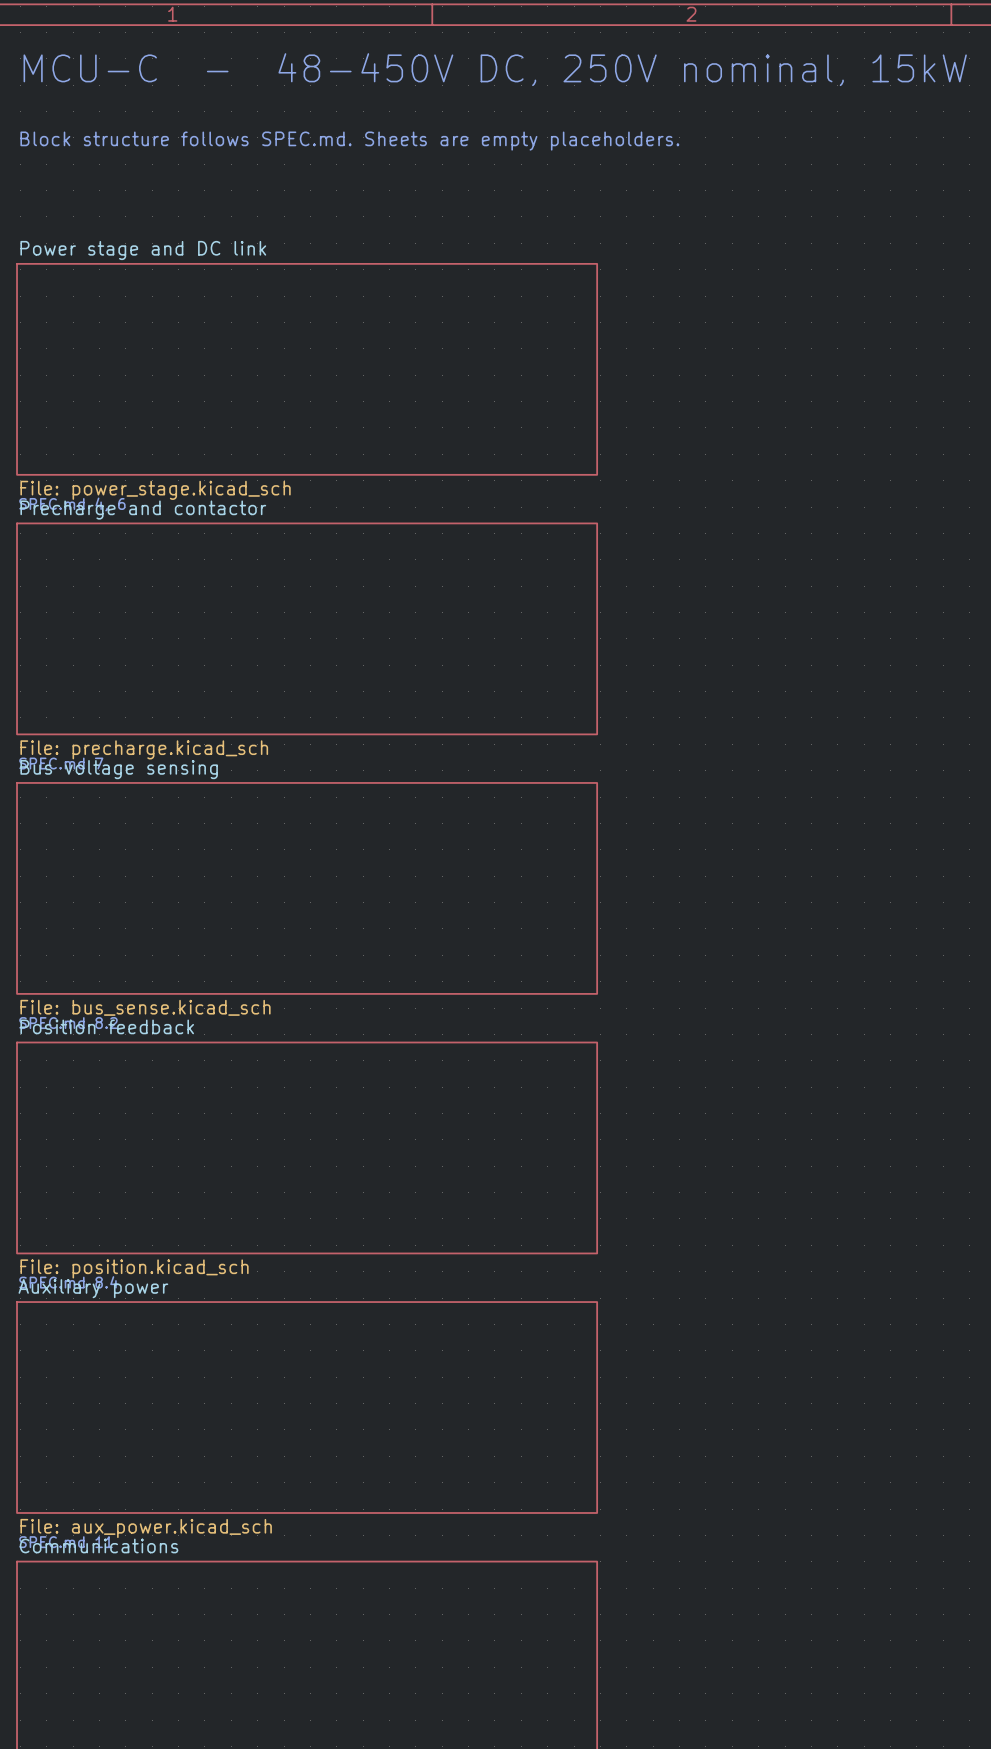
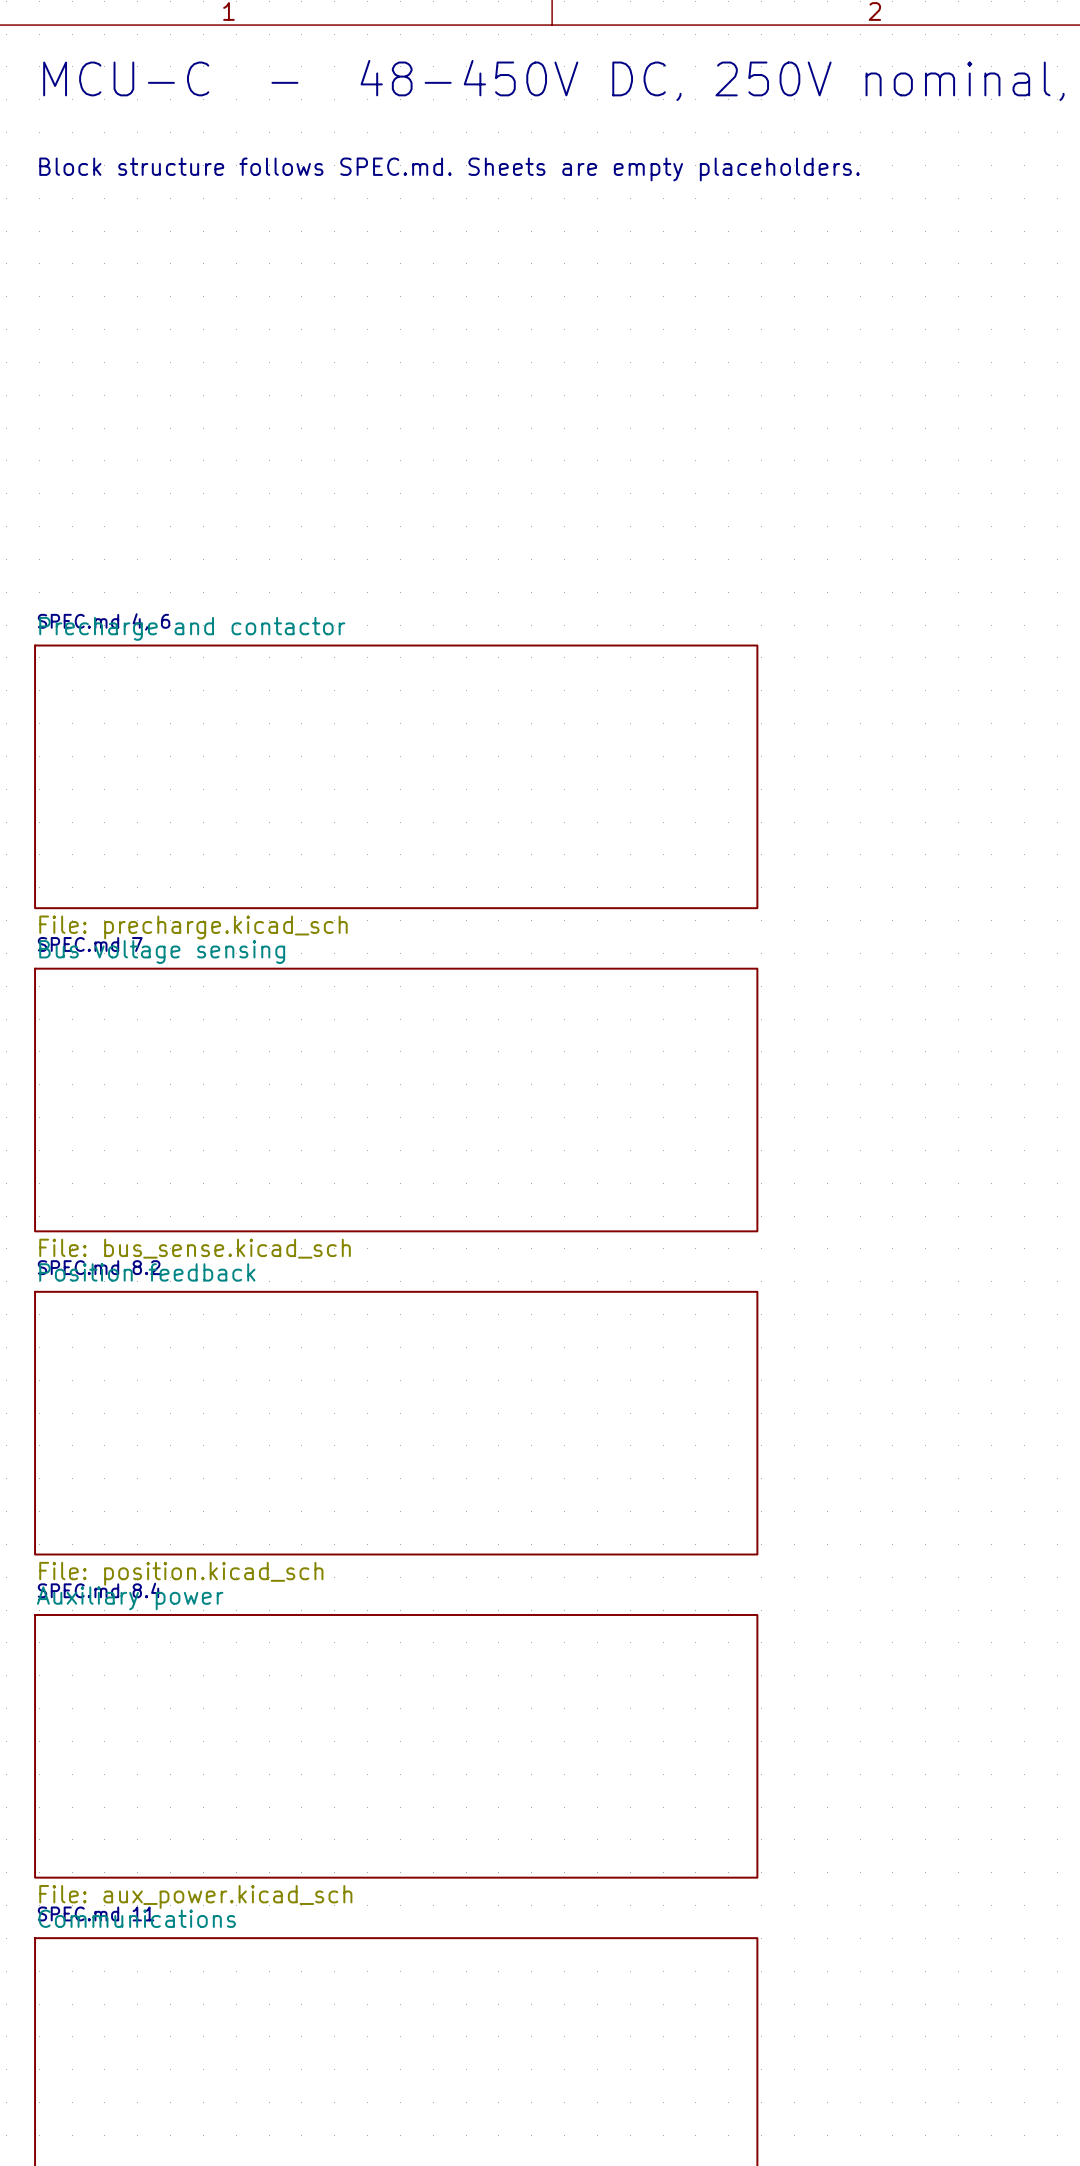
sheet Power stage and DC link: File: power_stage.kicad_sch (307, 369) -> none

